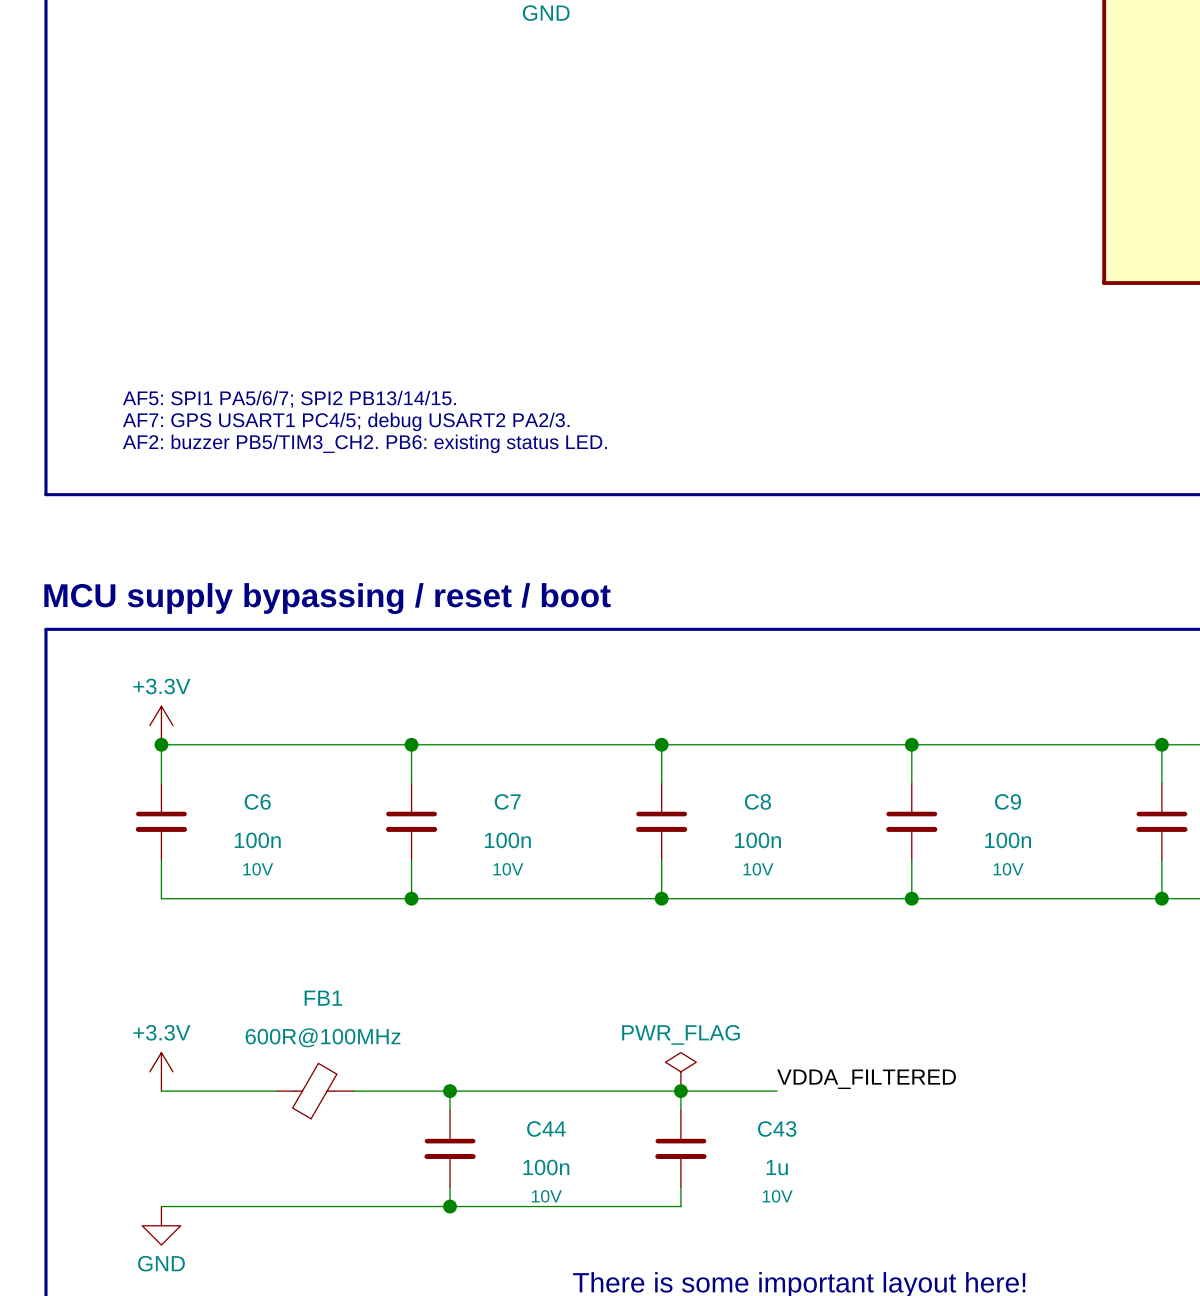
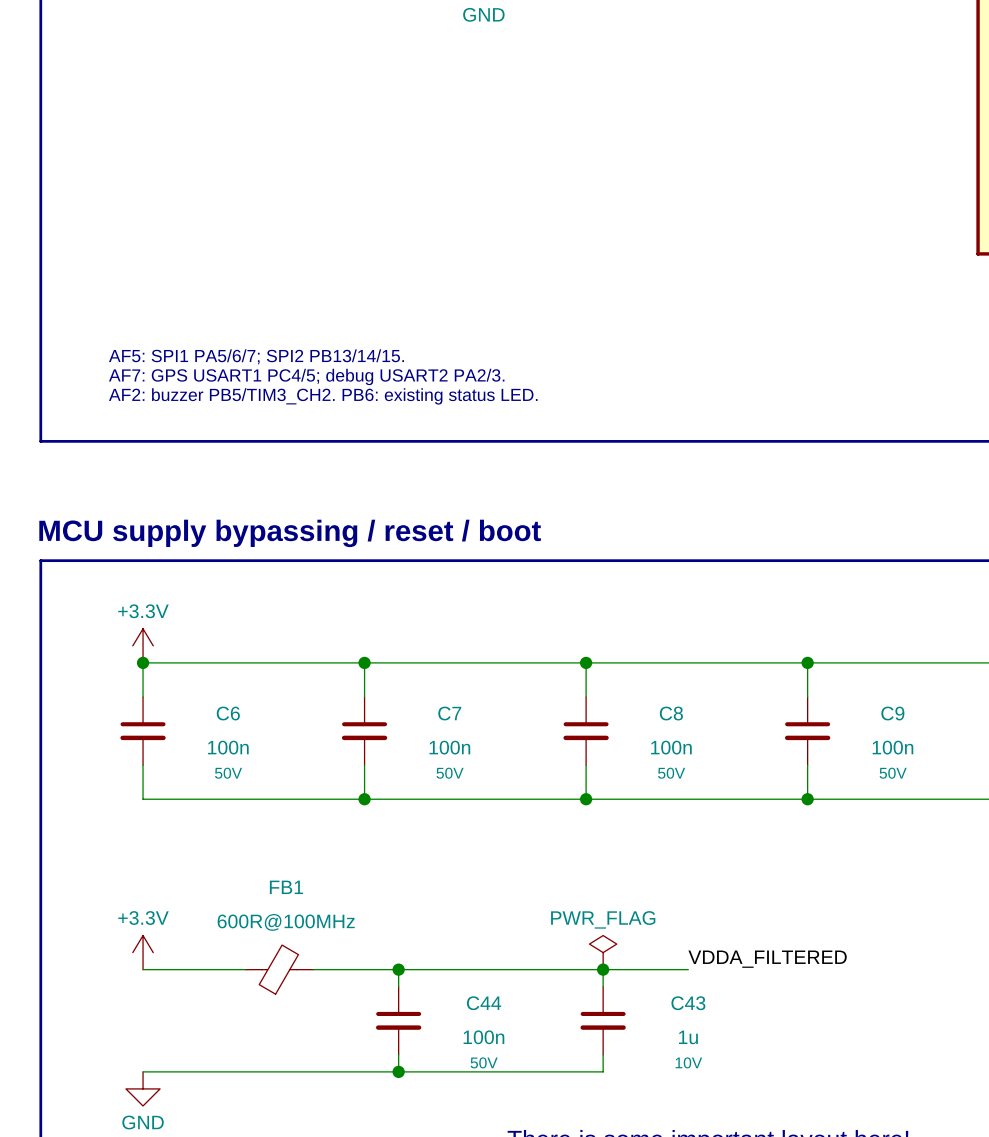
C6 text: 10V (258, 869) -> 50V (228, 773)
C7 text: 10V (508, 869) -> 50V (450, 773)
C8 text: 10V (758, 869) -> 50V (671, 773)
C9 text: 10V (1008, 869) -> 50V (893, 773)
C44 text: 10V (546, 1196) -> 50V (484, 1062)

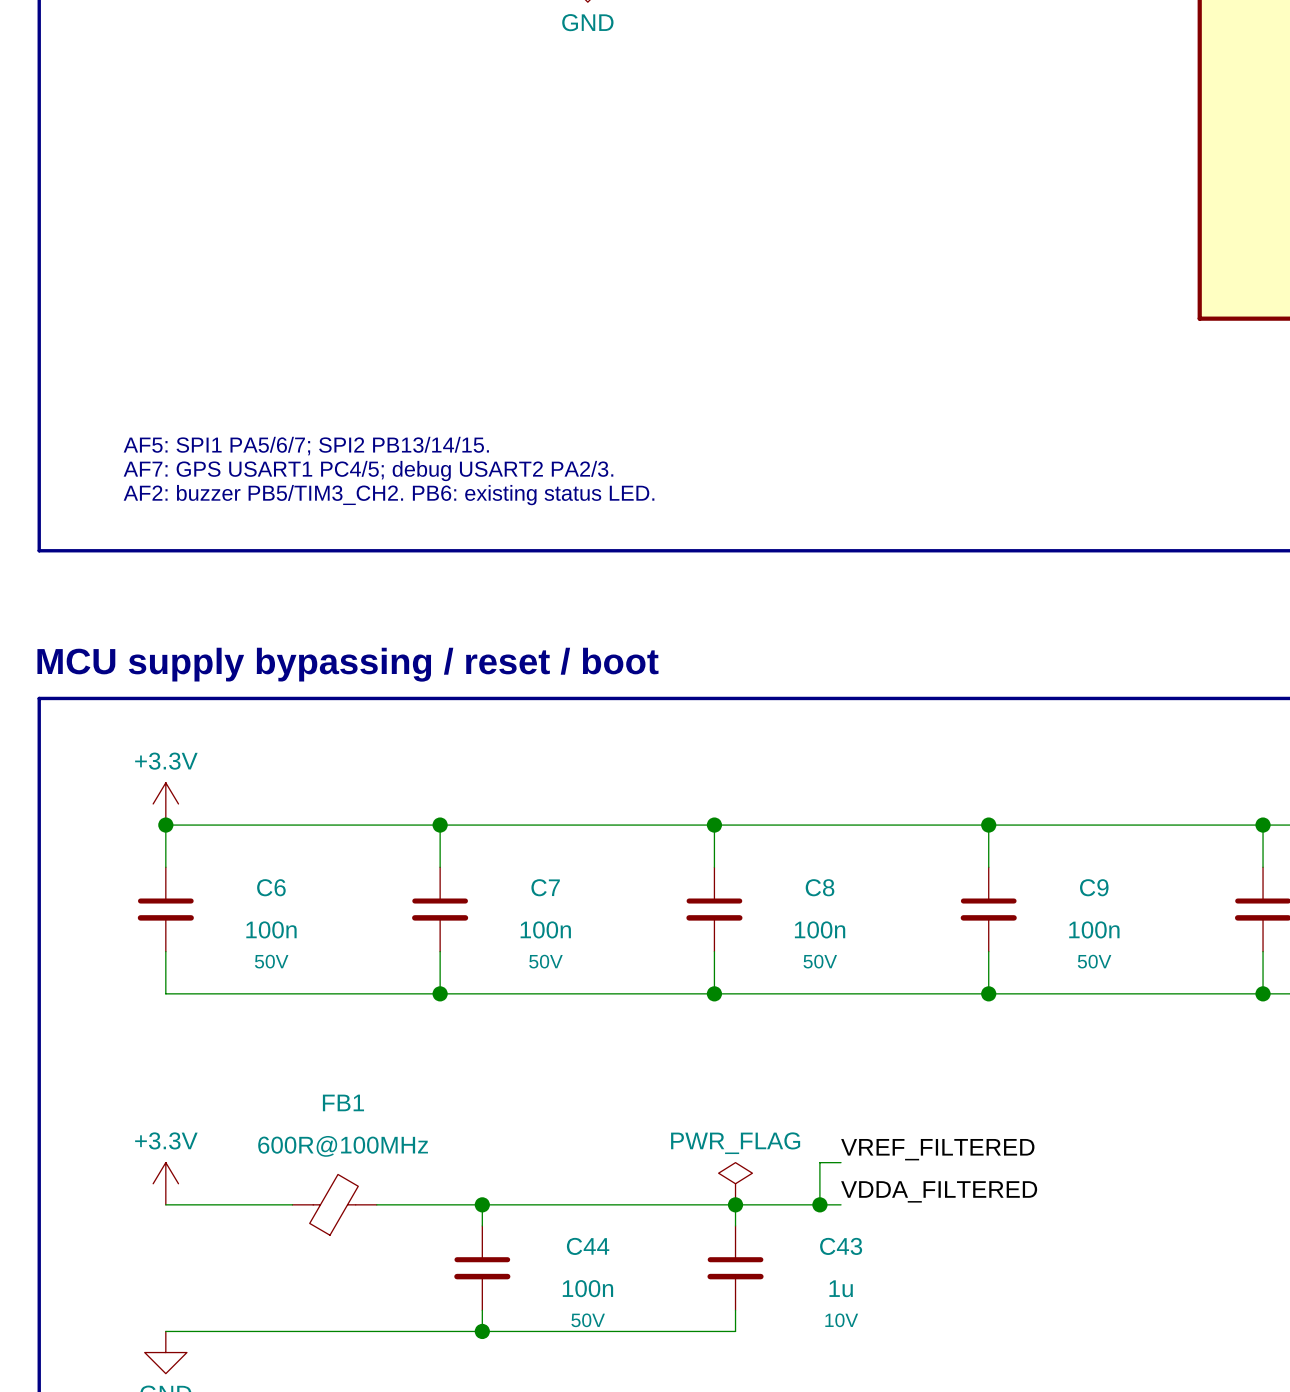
label: none -> VREF_FILTERED (937, 1149)
wire: none -> (841, 1162) (819, 1162) (819, 1204)
junction: none -> (819, 1204)

